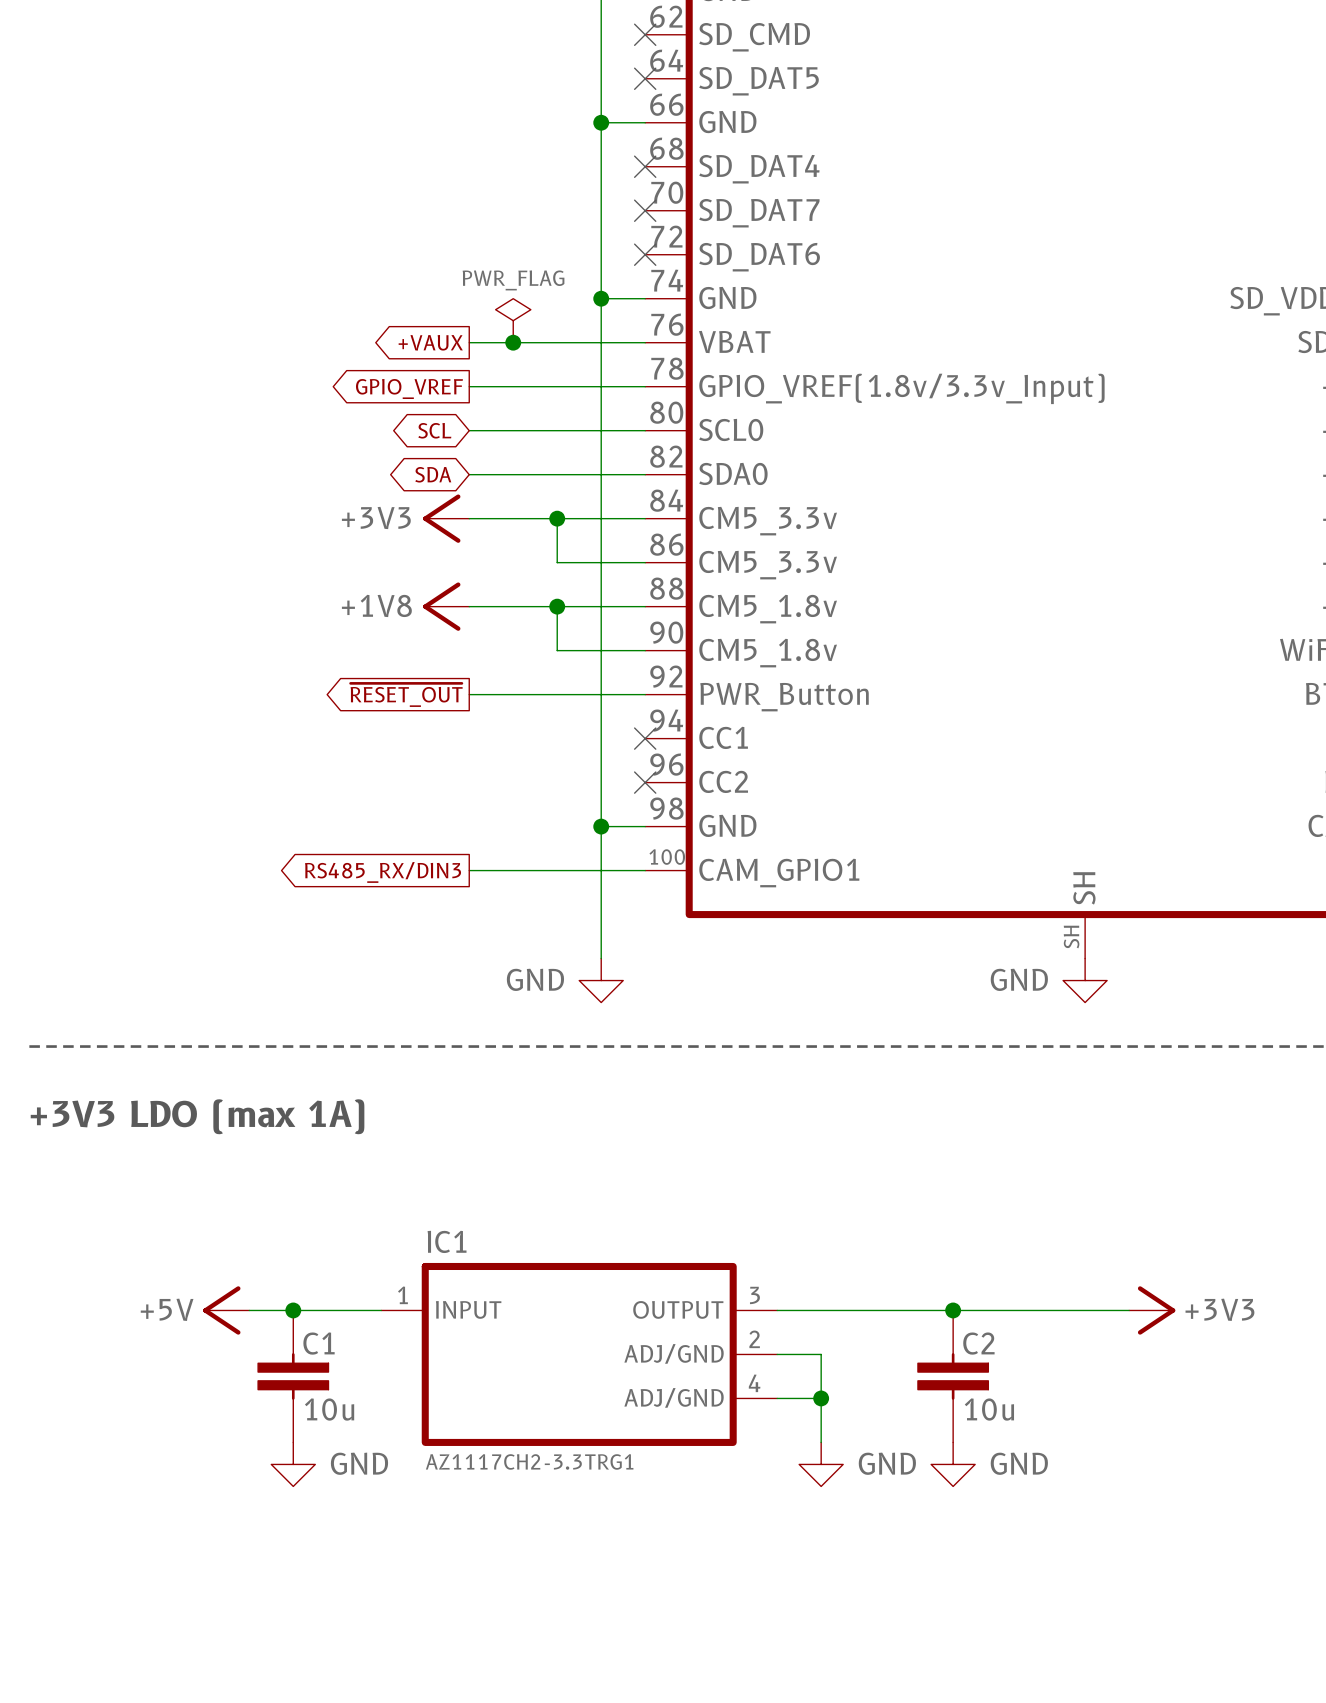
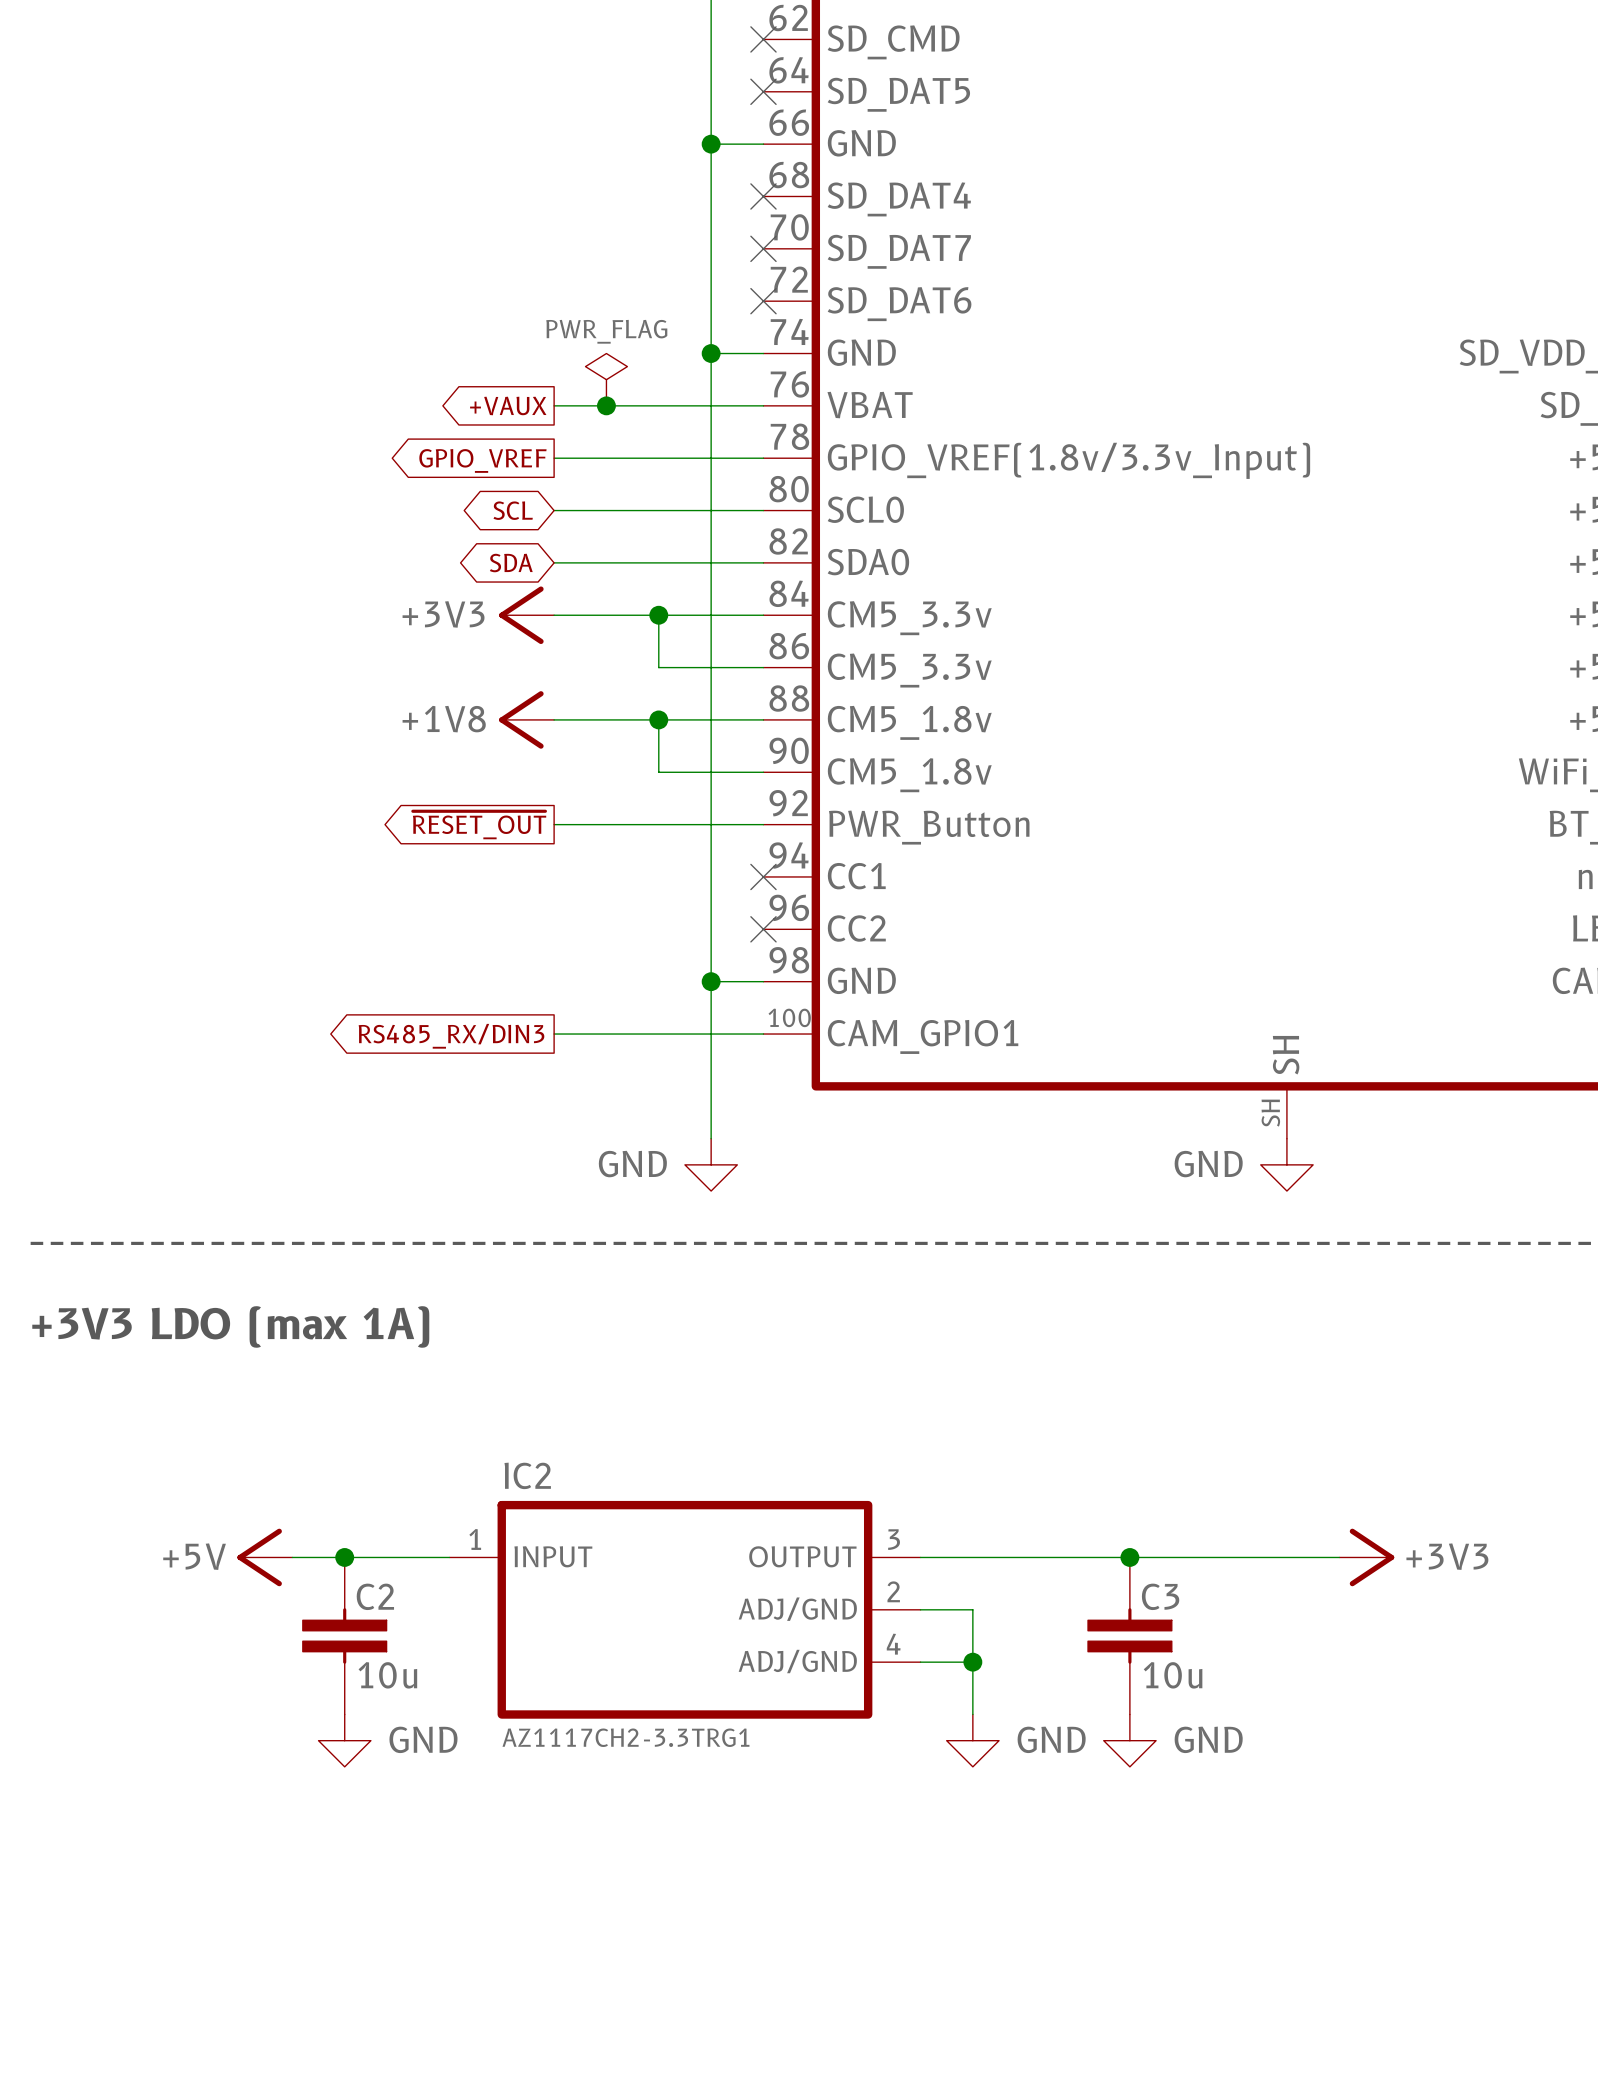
IC1 name: IC1 (447, 1241) -> IC2 (527, 1475)
C1 name: C1 (319, 1343) -> C2 (375, 1596)
C2 name: C2 (978, 1343) -> C3 (1160, 1596)

